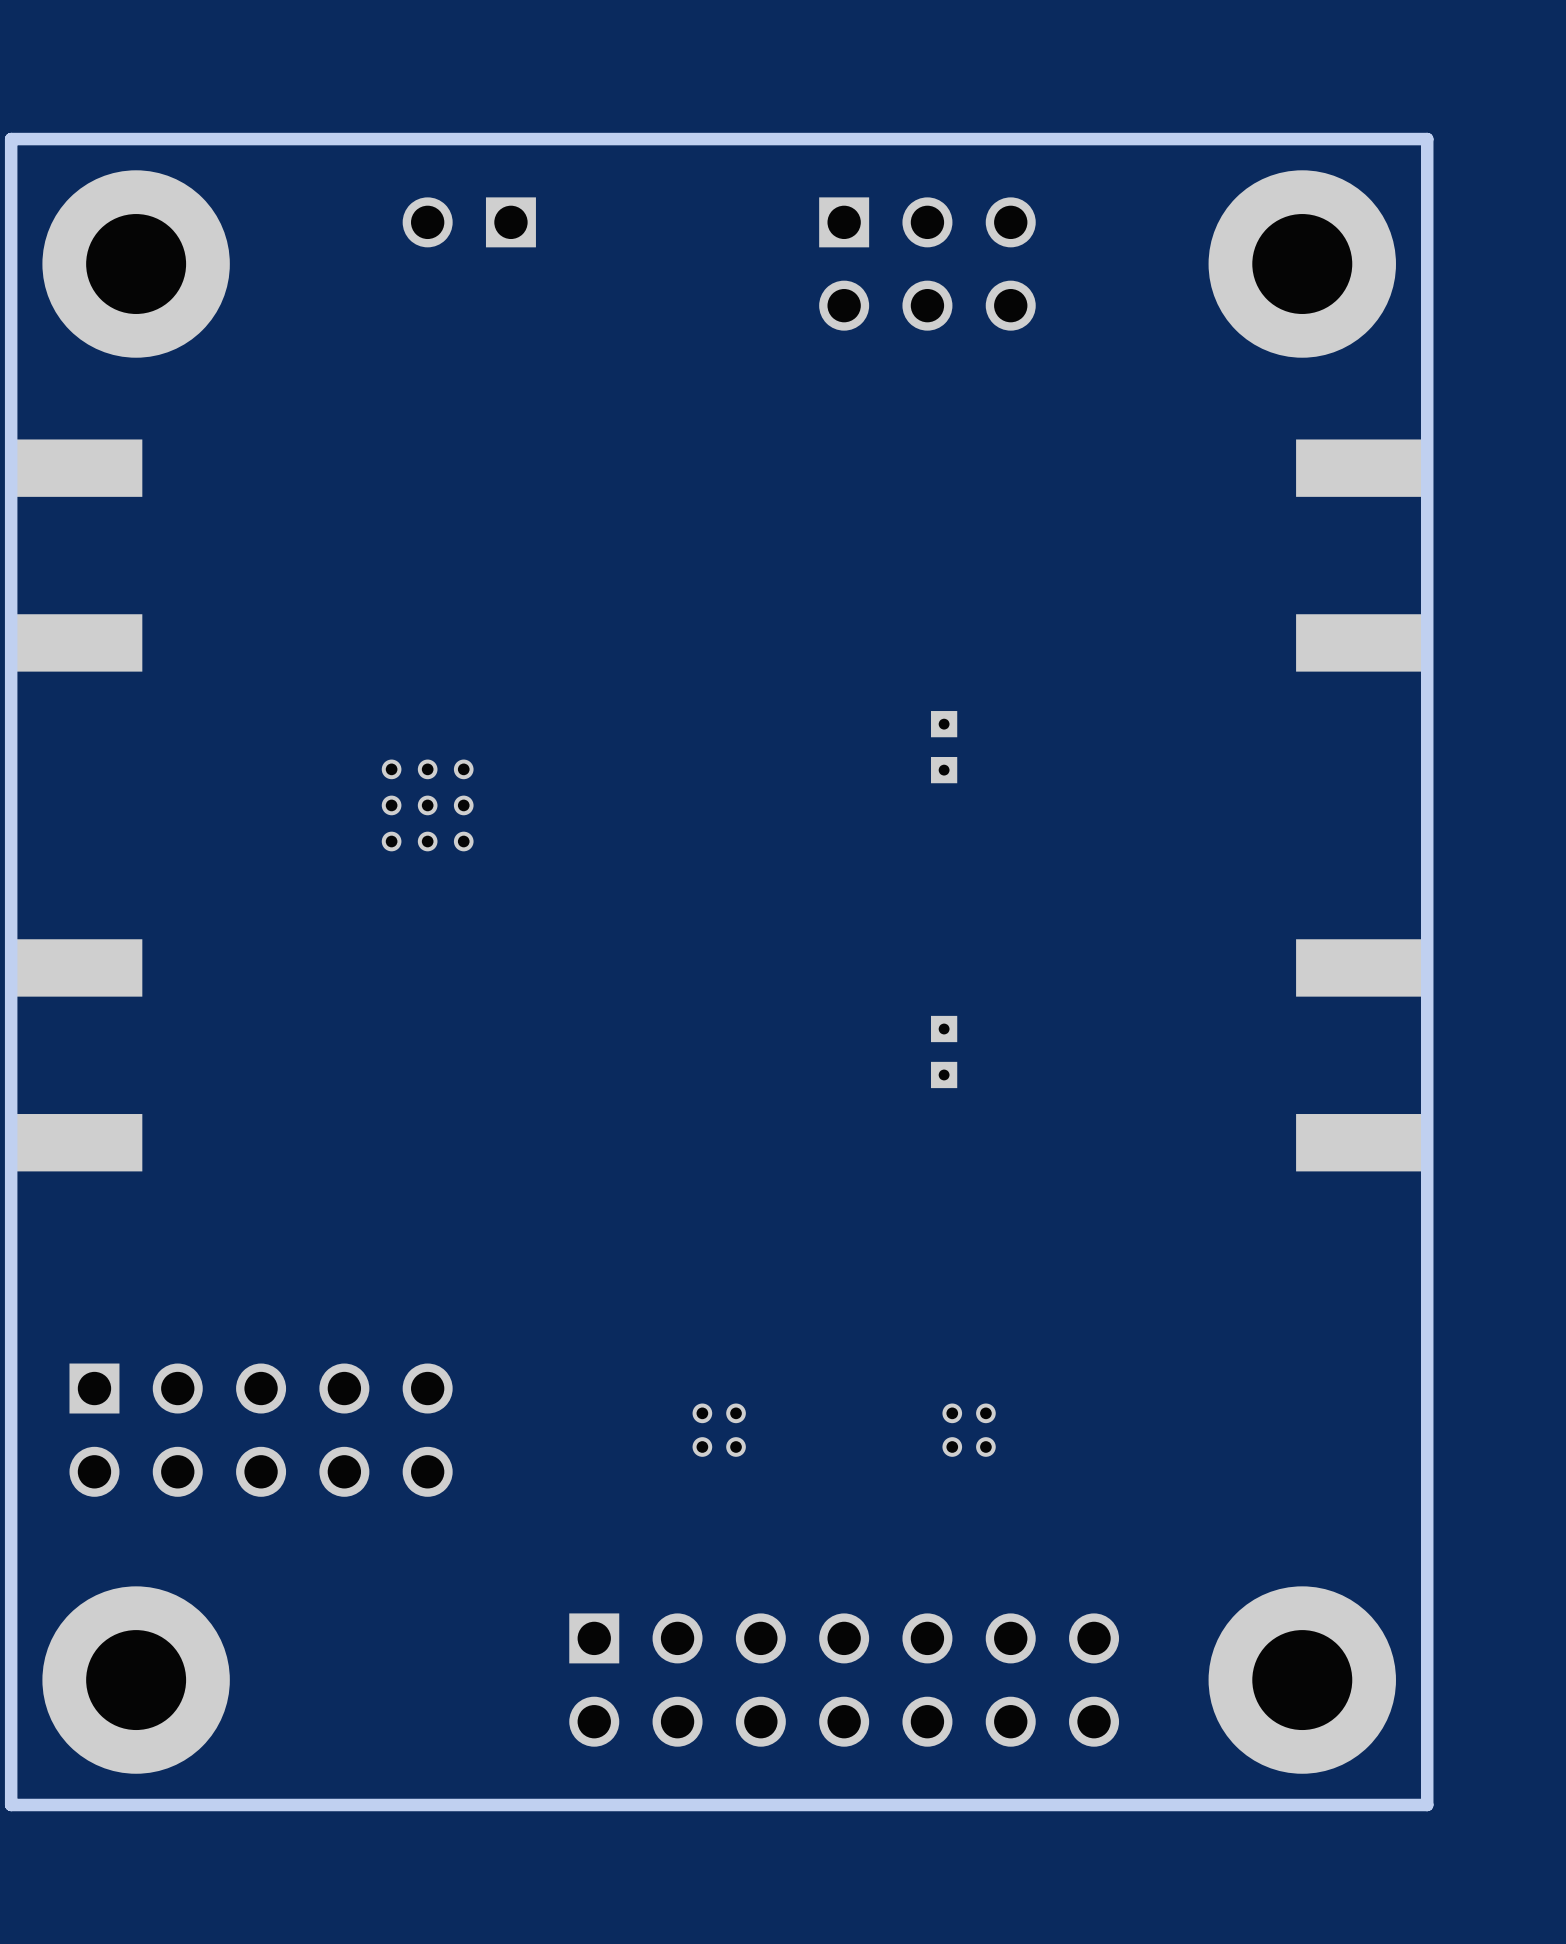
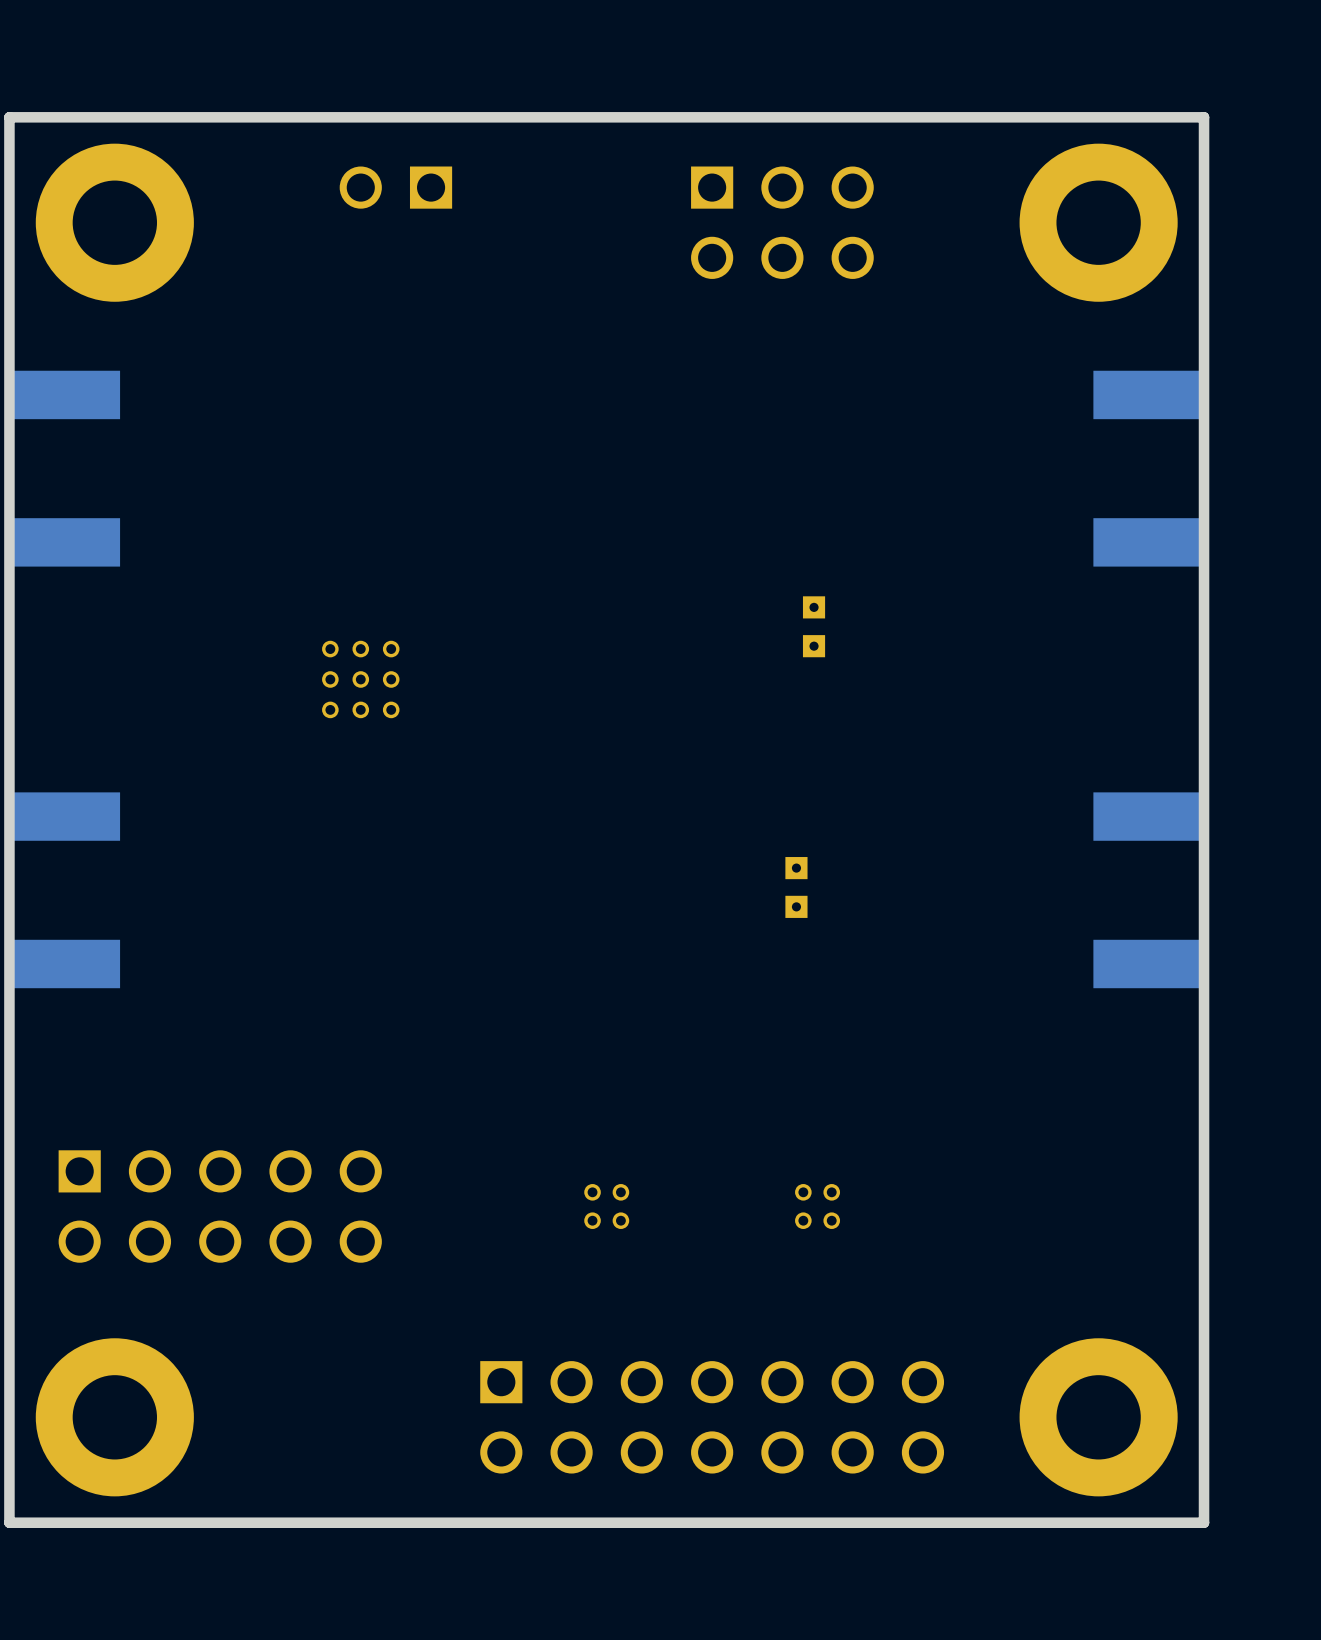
part position: (944, 747) -> (814, 626)

